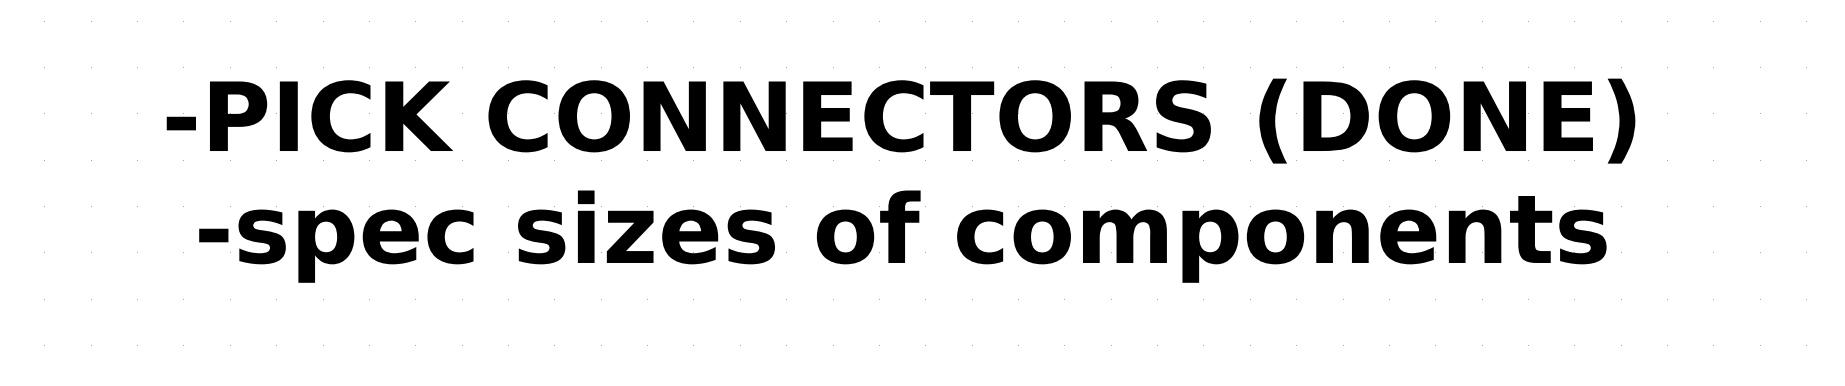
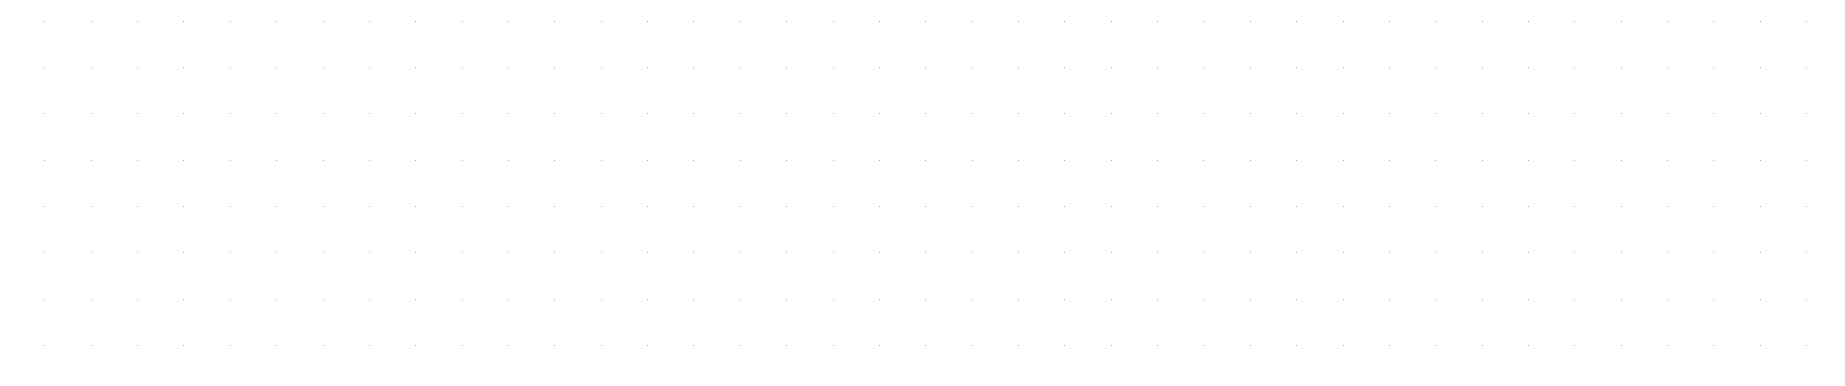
text: -PICK CONNECTORS (DONE) (901, 121) -> none
text: -spec sizes of components (902, 236) -> none

